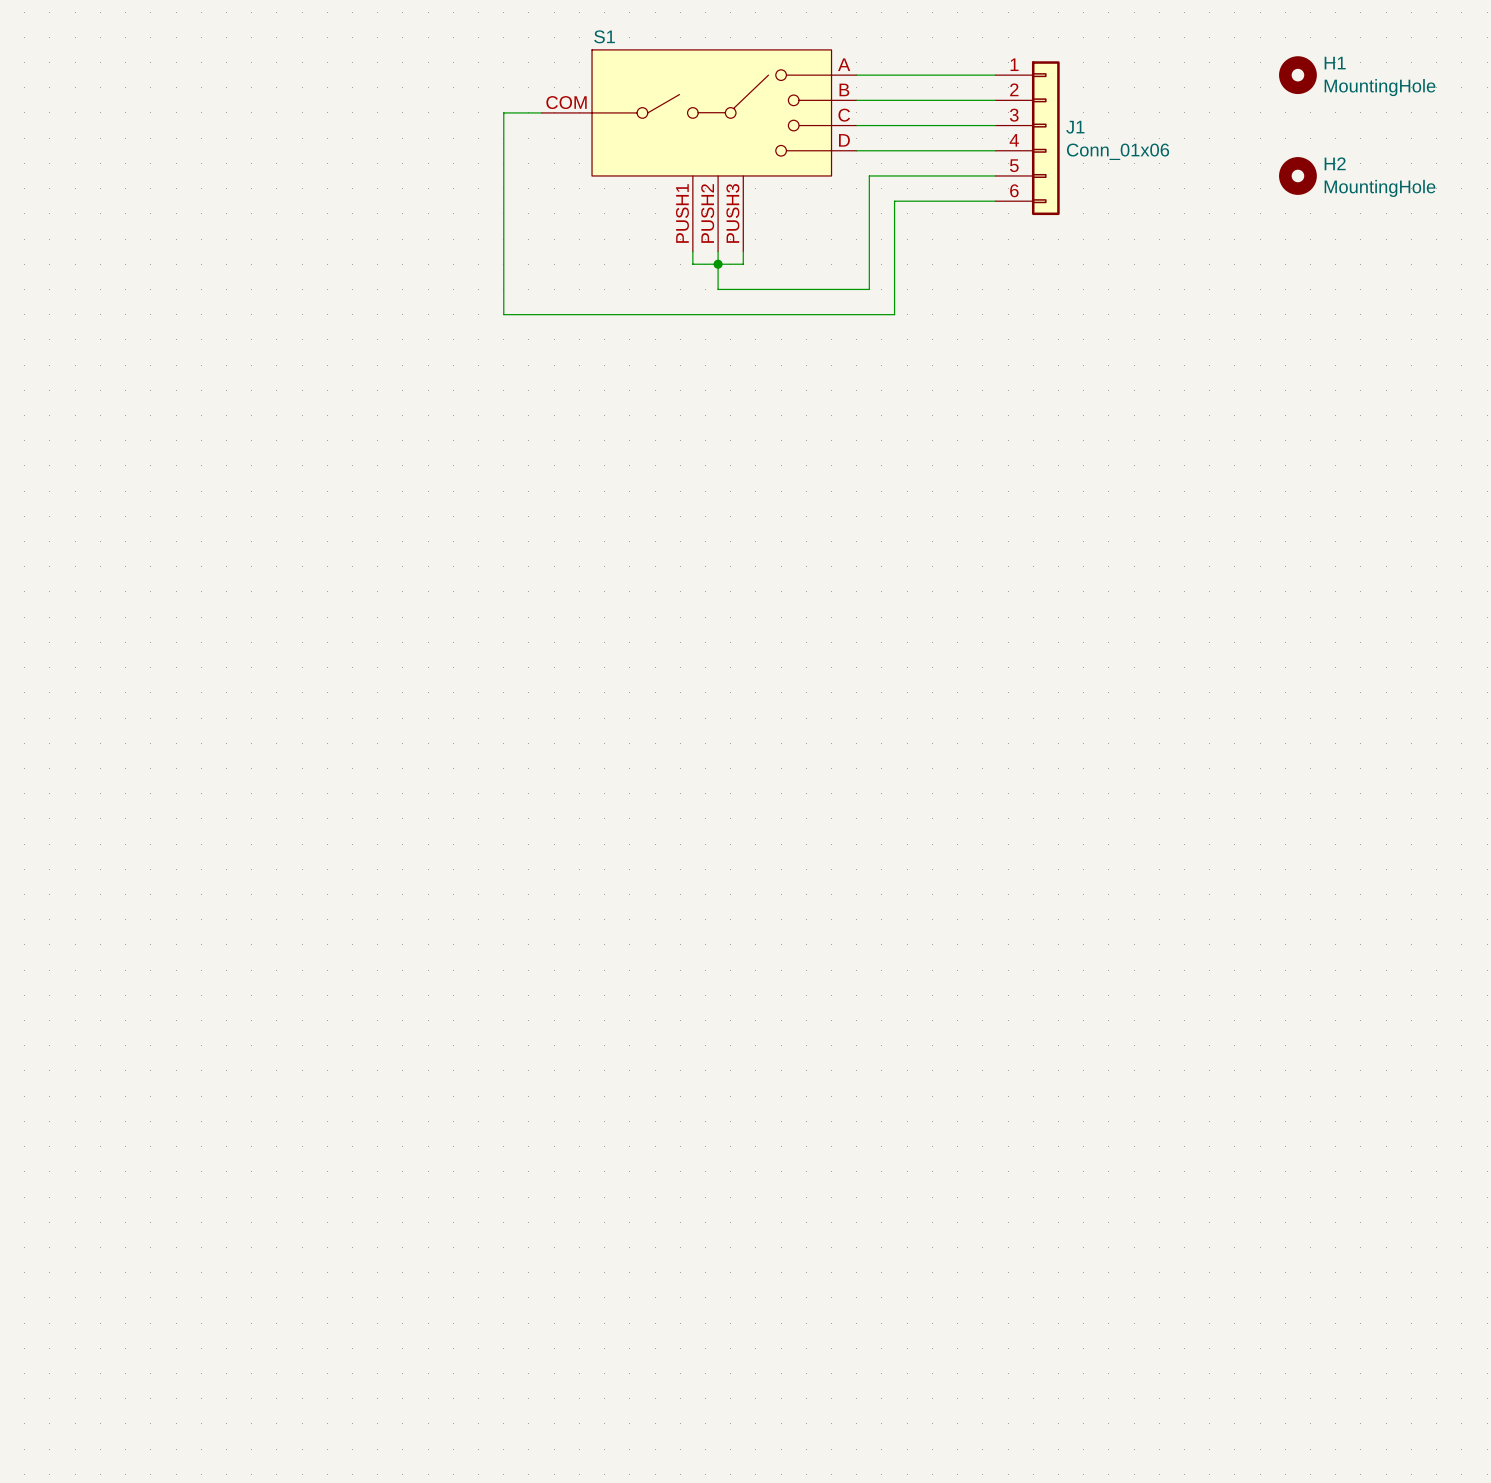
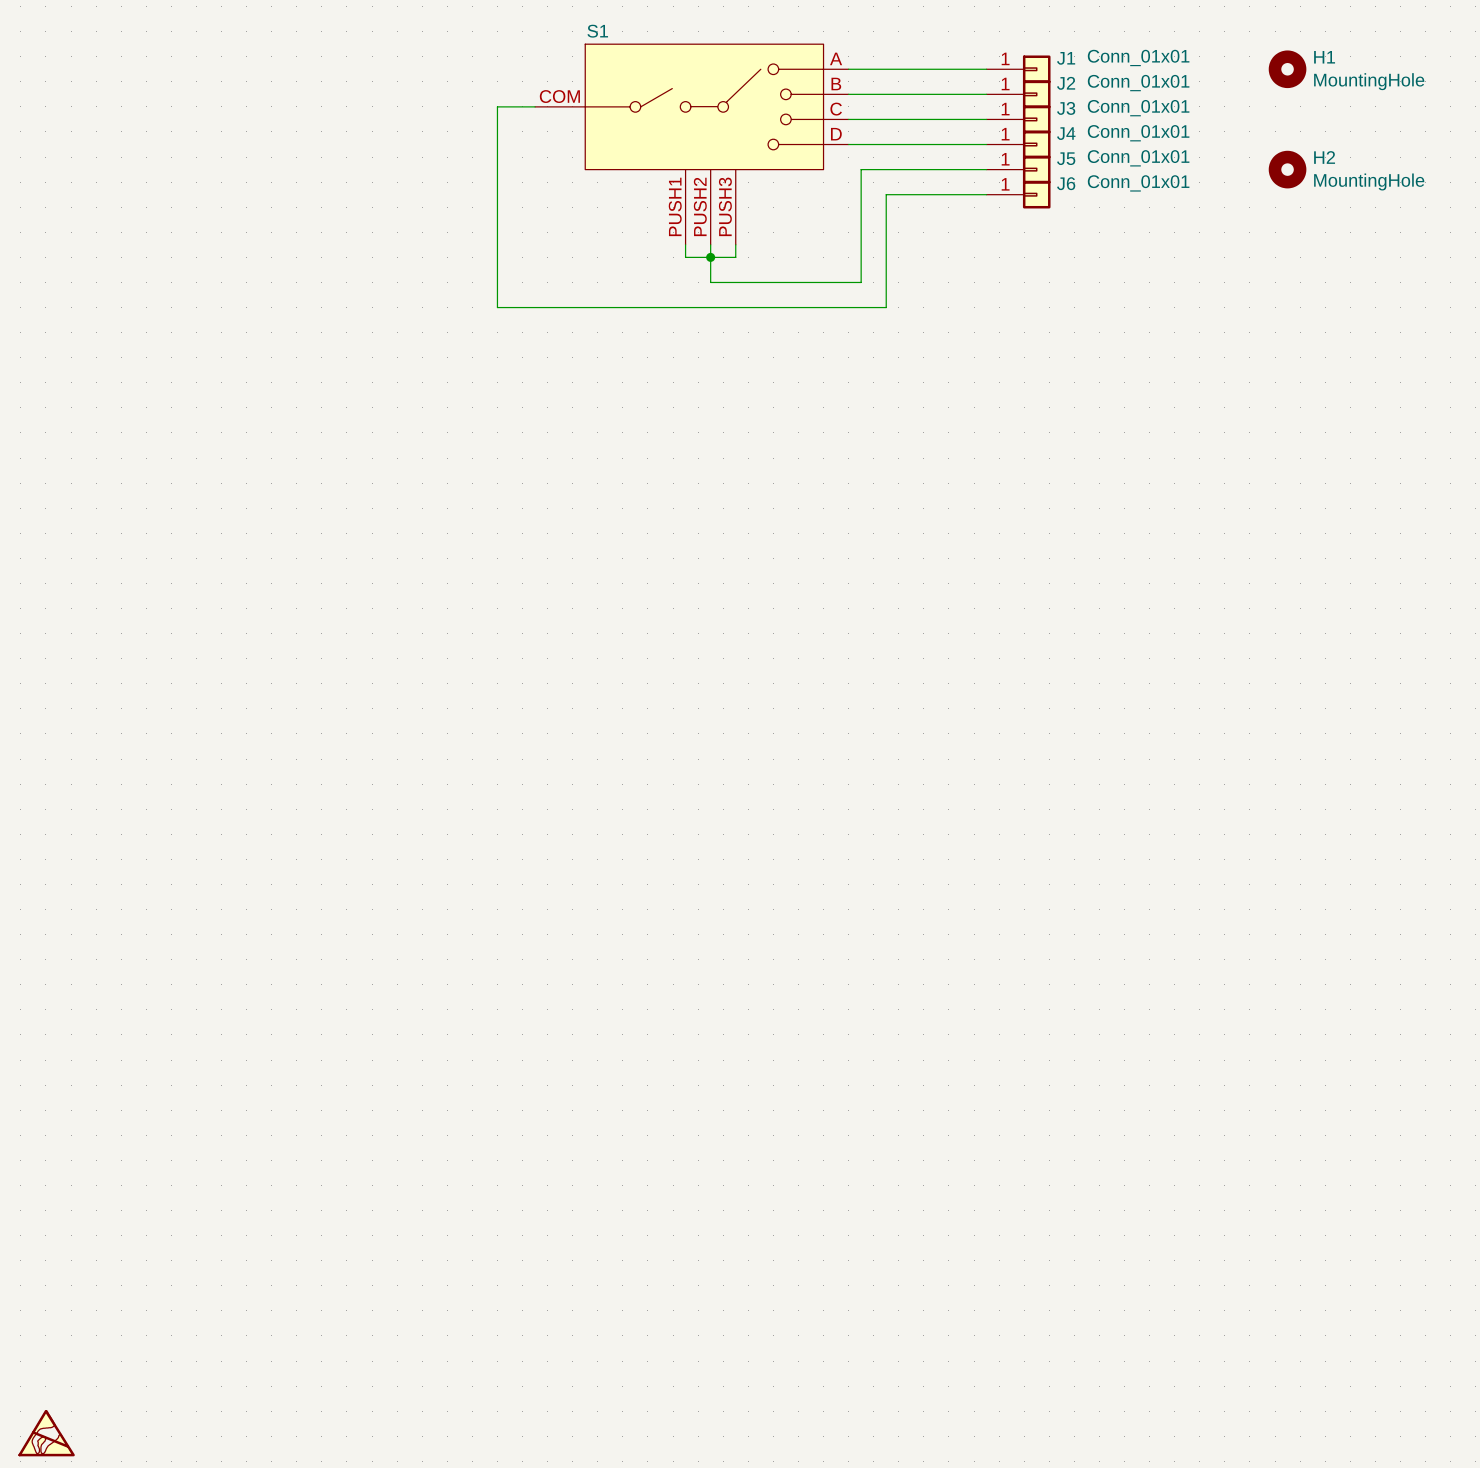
J1 symbol: [995, 61, 1060, 216] -> [986, 55, 1051, 84]
J2: none -> Conn_01x01 (1018, 94)
J3: none -> Conn_01x01 (1018, 119)
J4: none -> Conn_01x01 (1018, 144)
J1 value: Conn_01x06 (1118, 151) -> Conn_01x01 (1138, 57)
J5: none -> Conn_01x01 (1018, 169)
J6: none -> Conn_01x01 (1018, 194)
power symbol: none -> (46, 1433)

